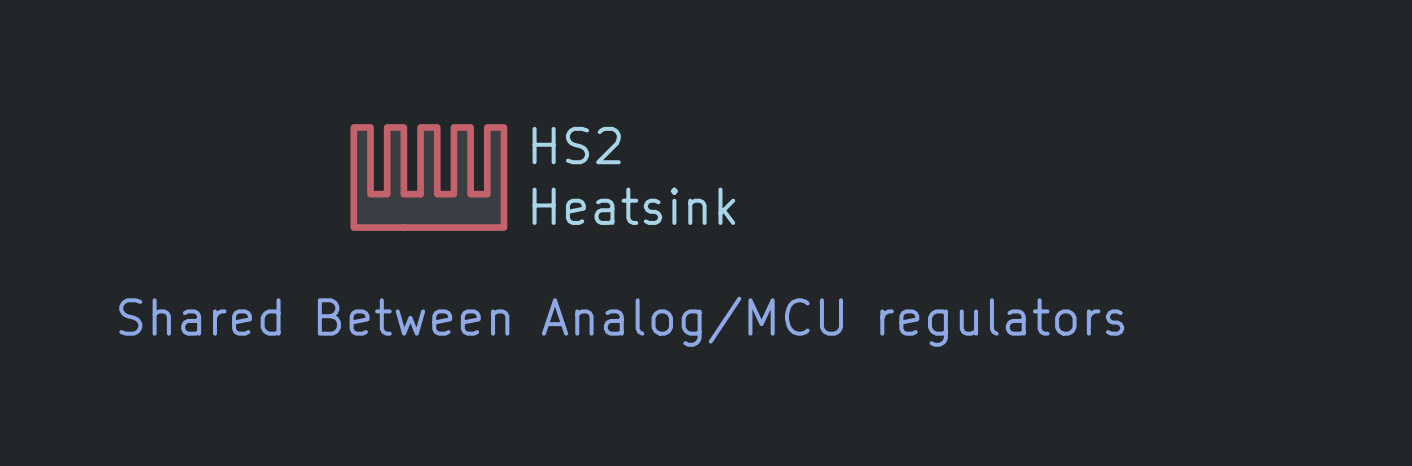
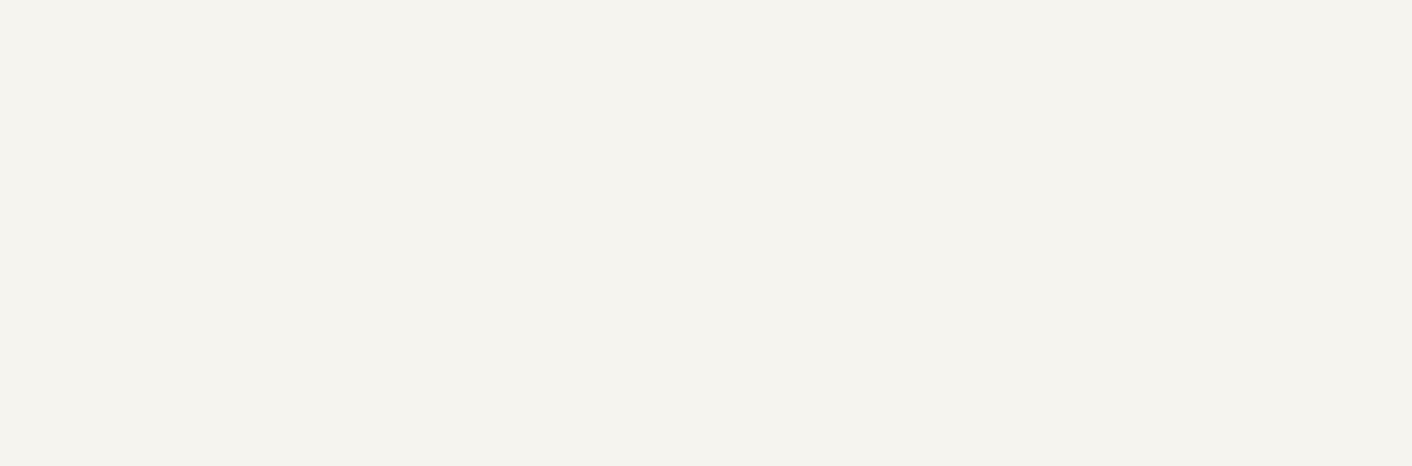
HS2: Heatsink (428, 177) -> none
text: Shared Between Analog/MCU regulators (621, 321) -> none

